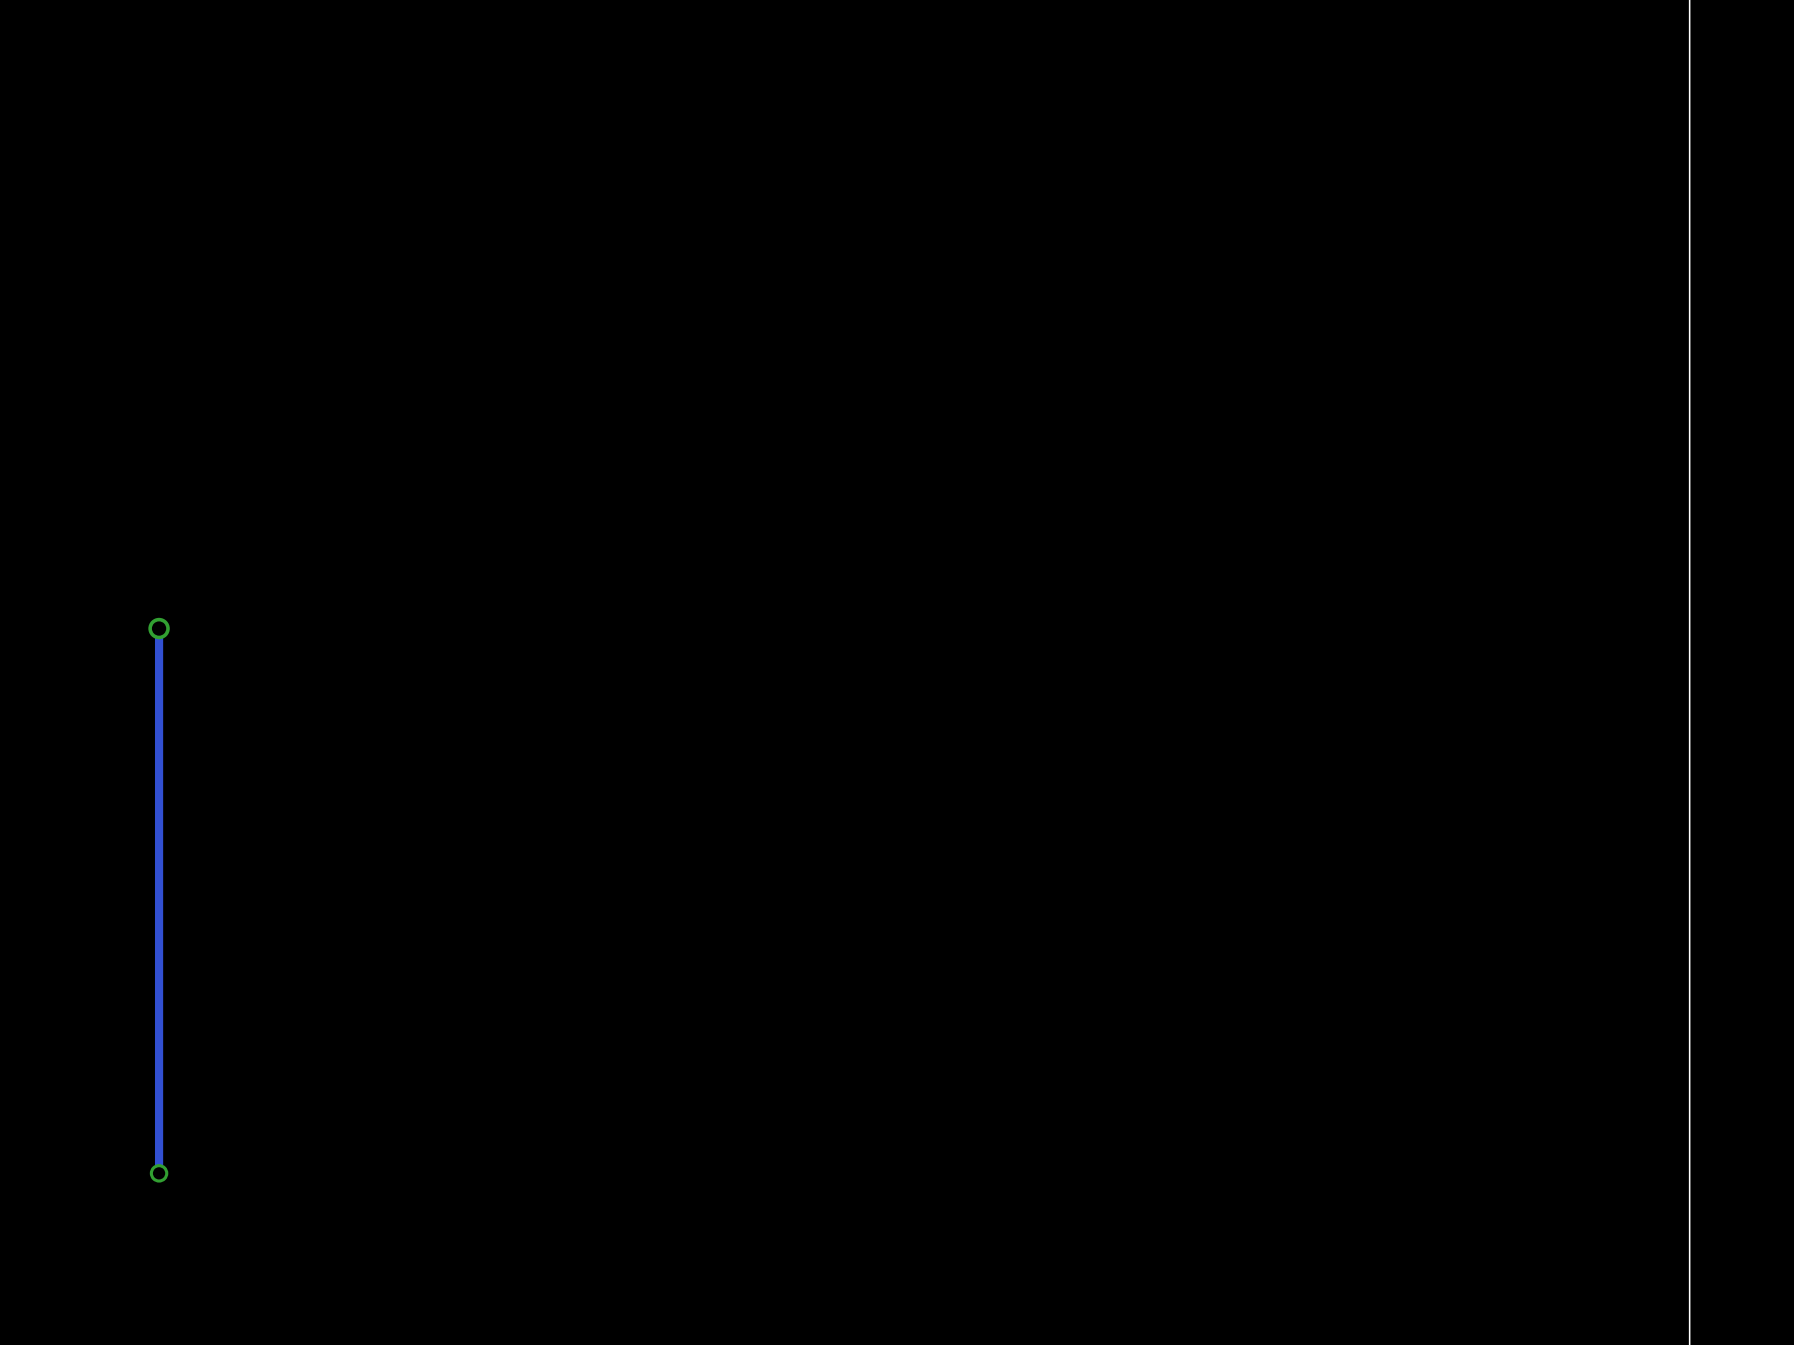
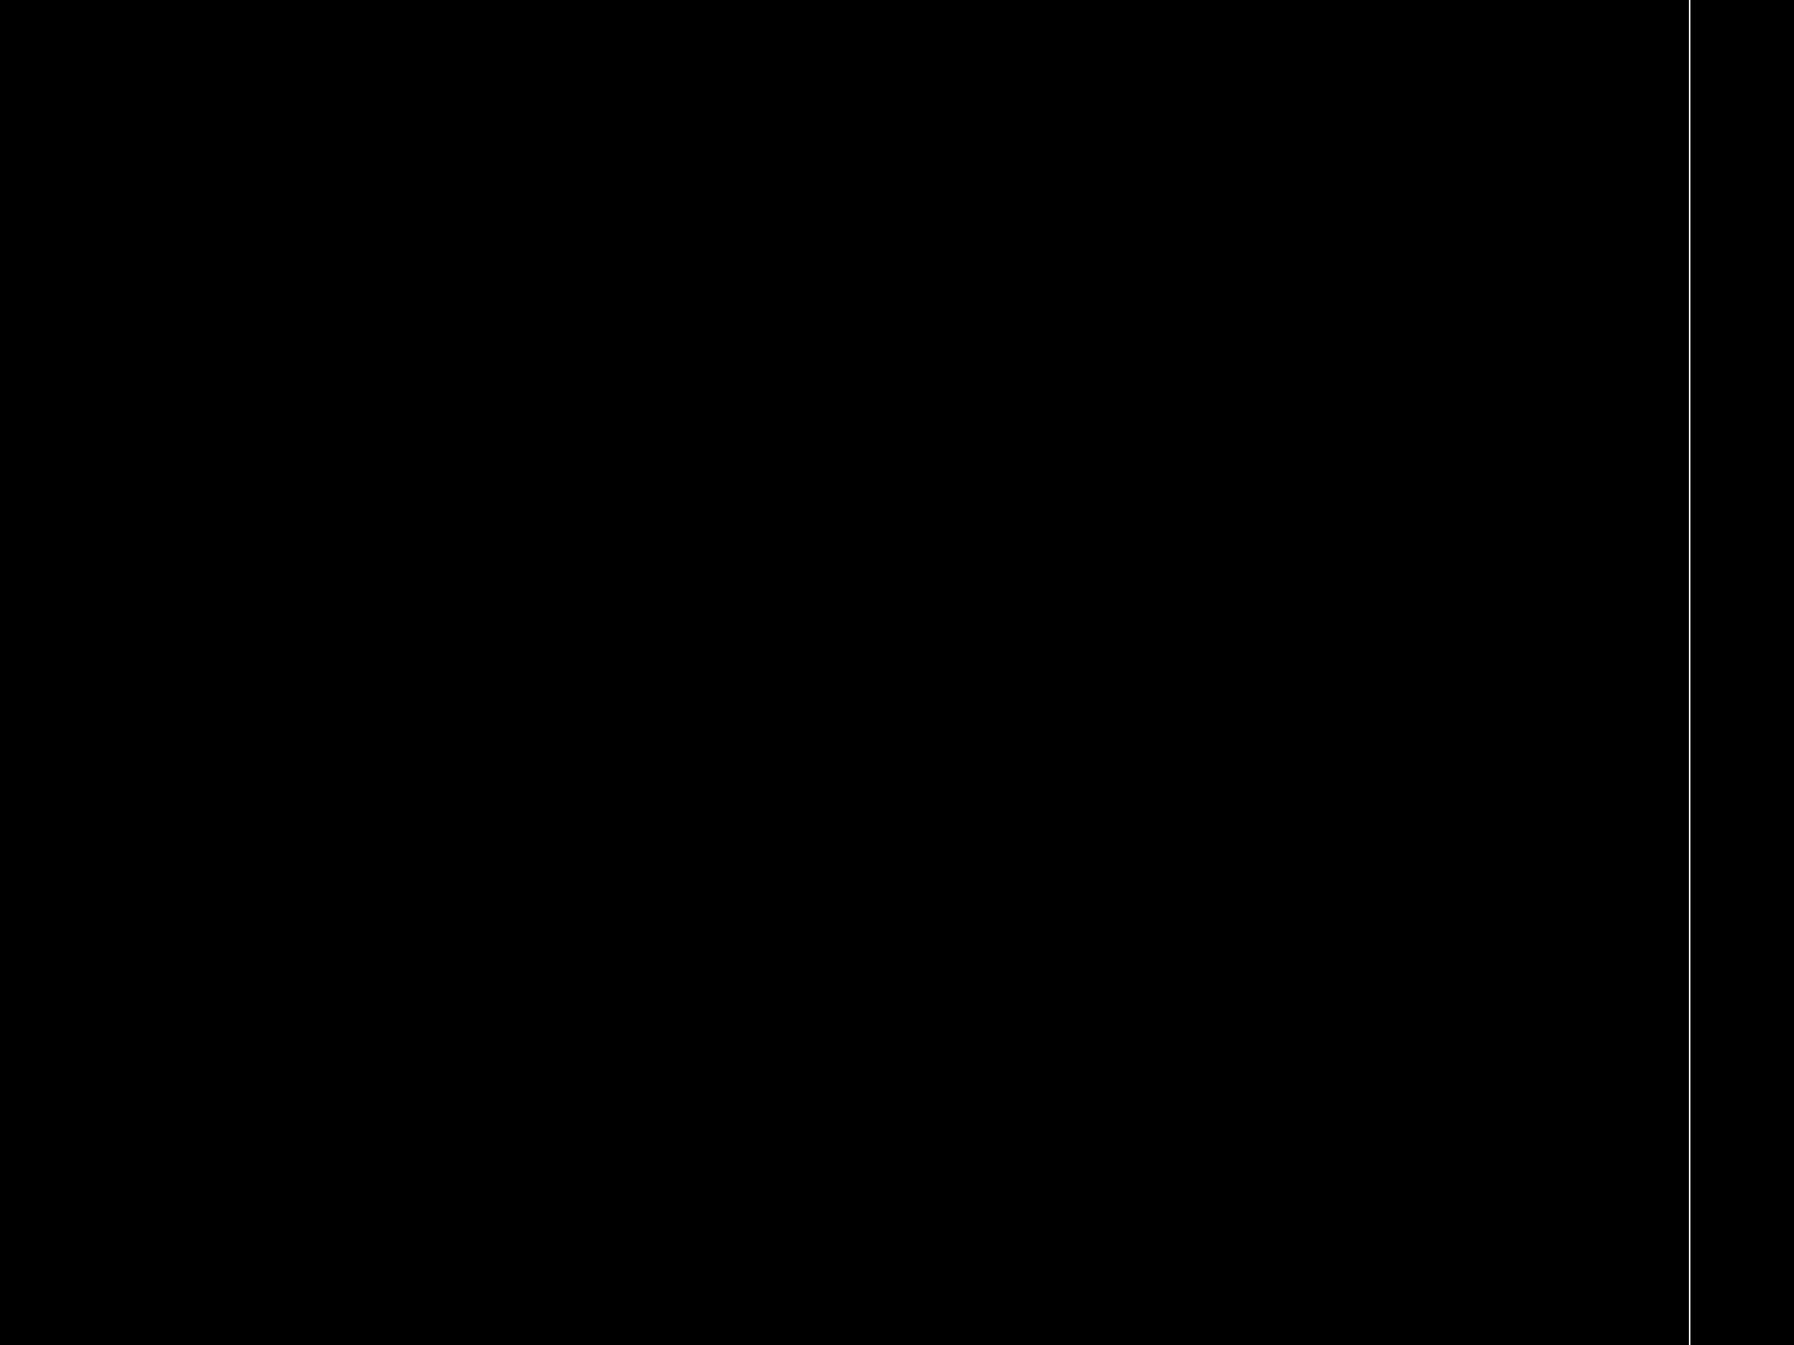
track: (159, 628) (159, 1173) -> none
via: (159, 628) -> none
via: (159, 1173) -> none

